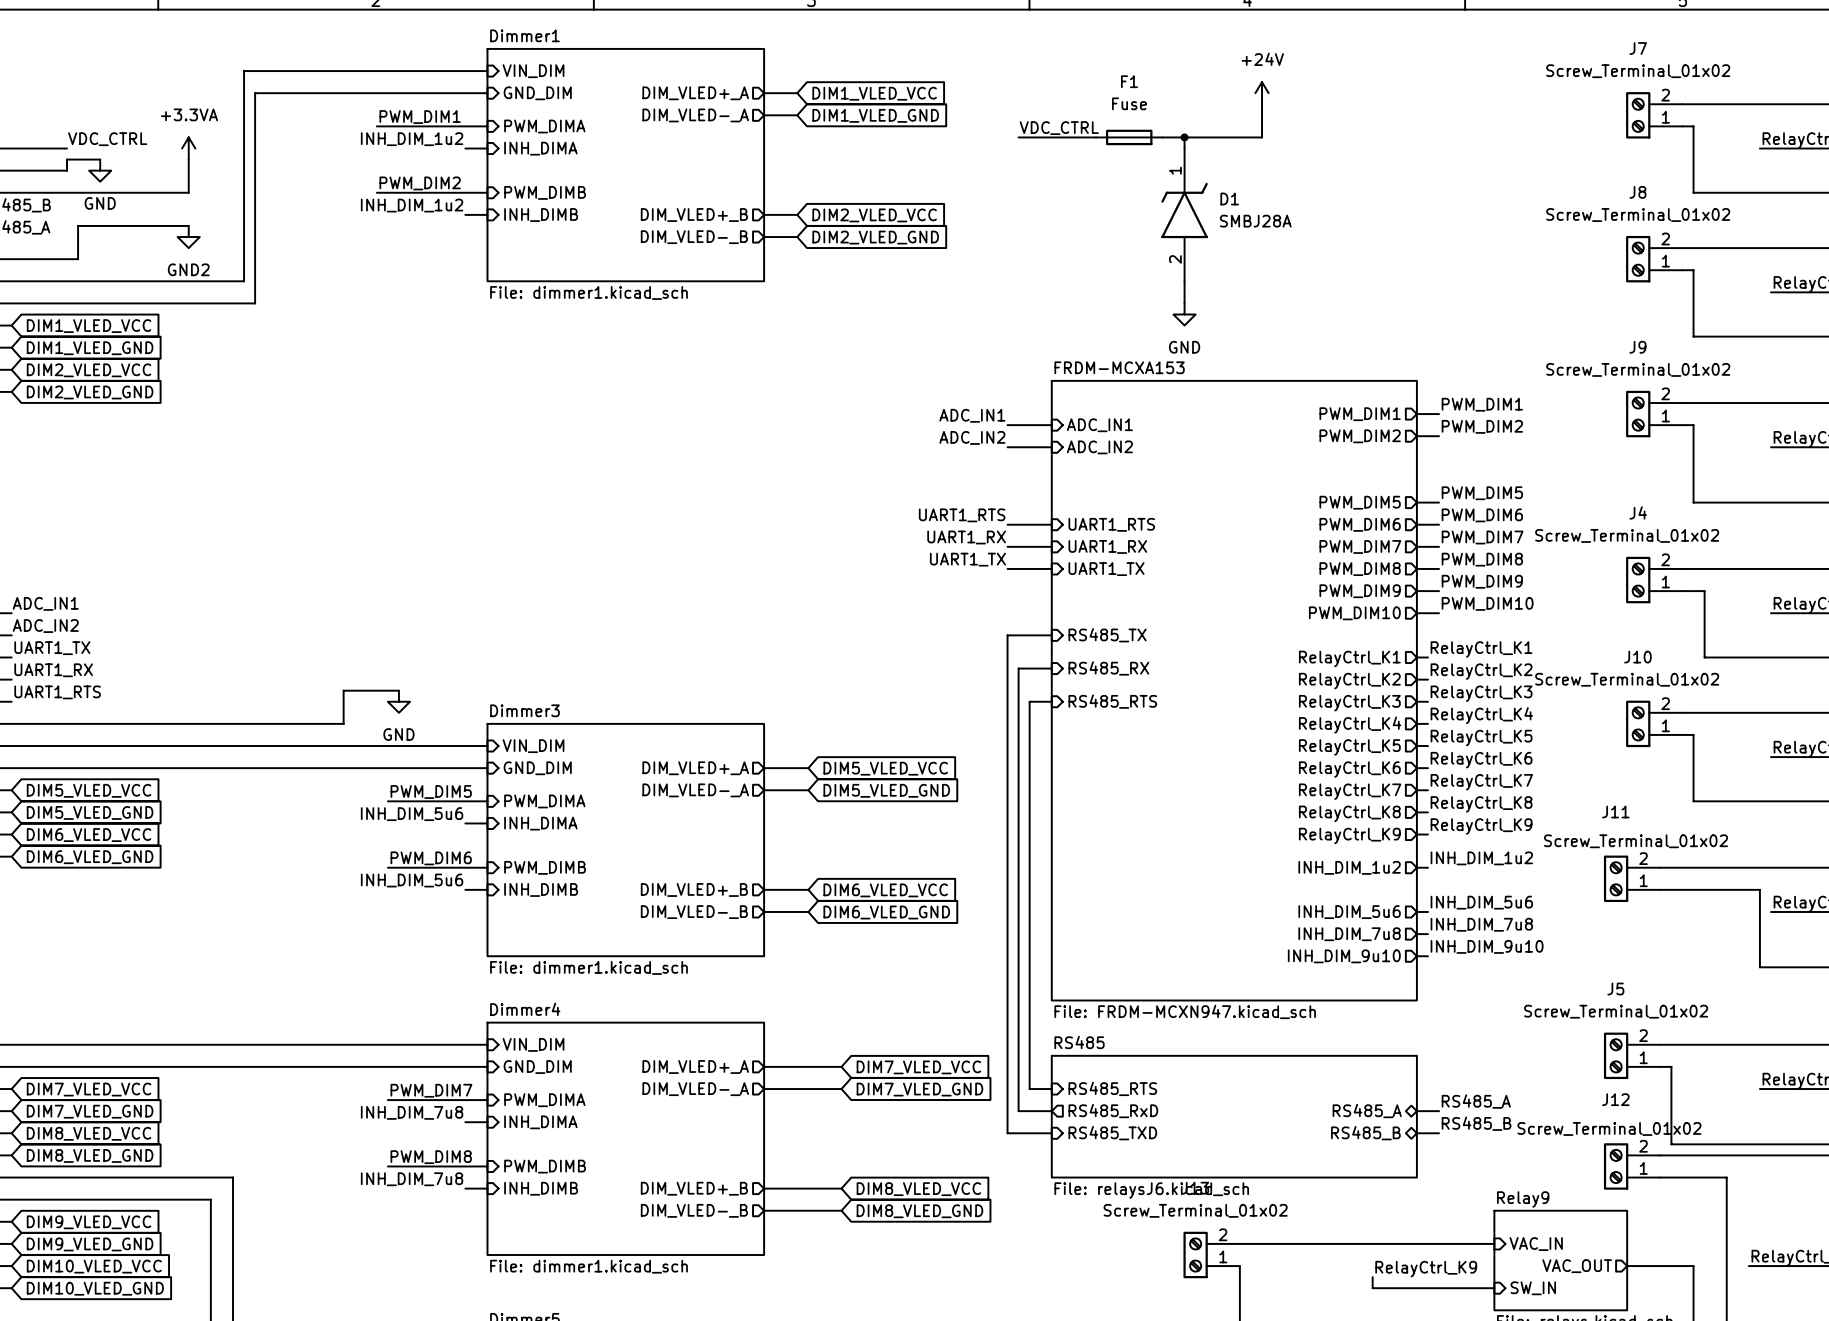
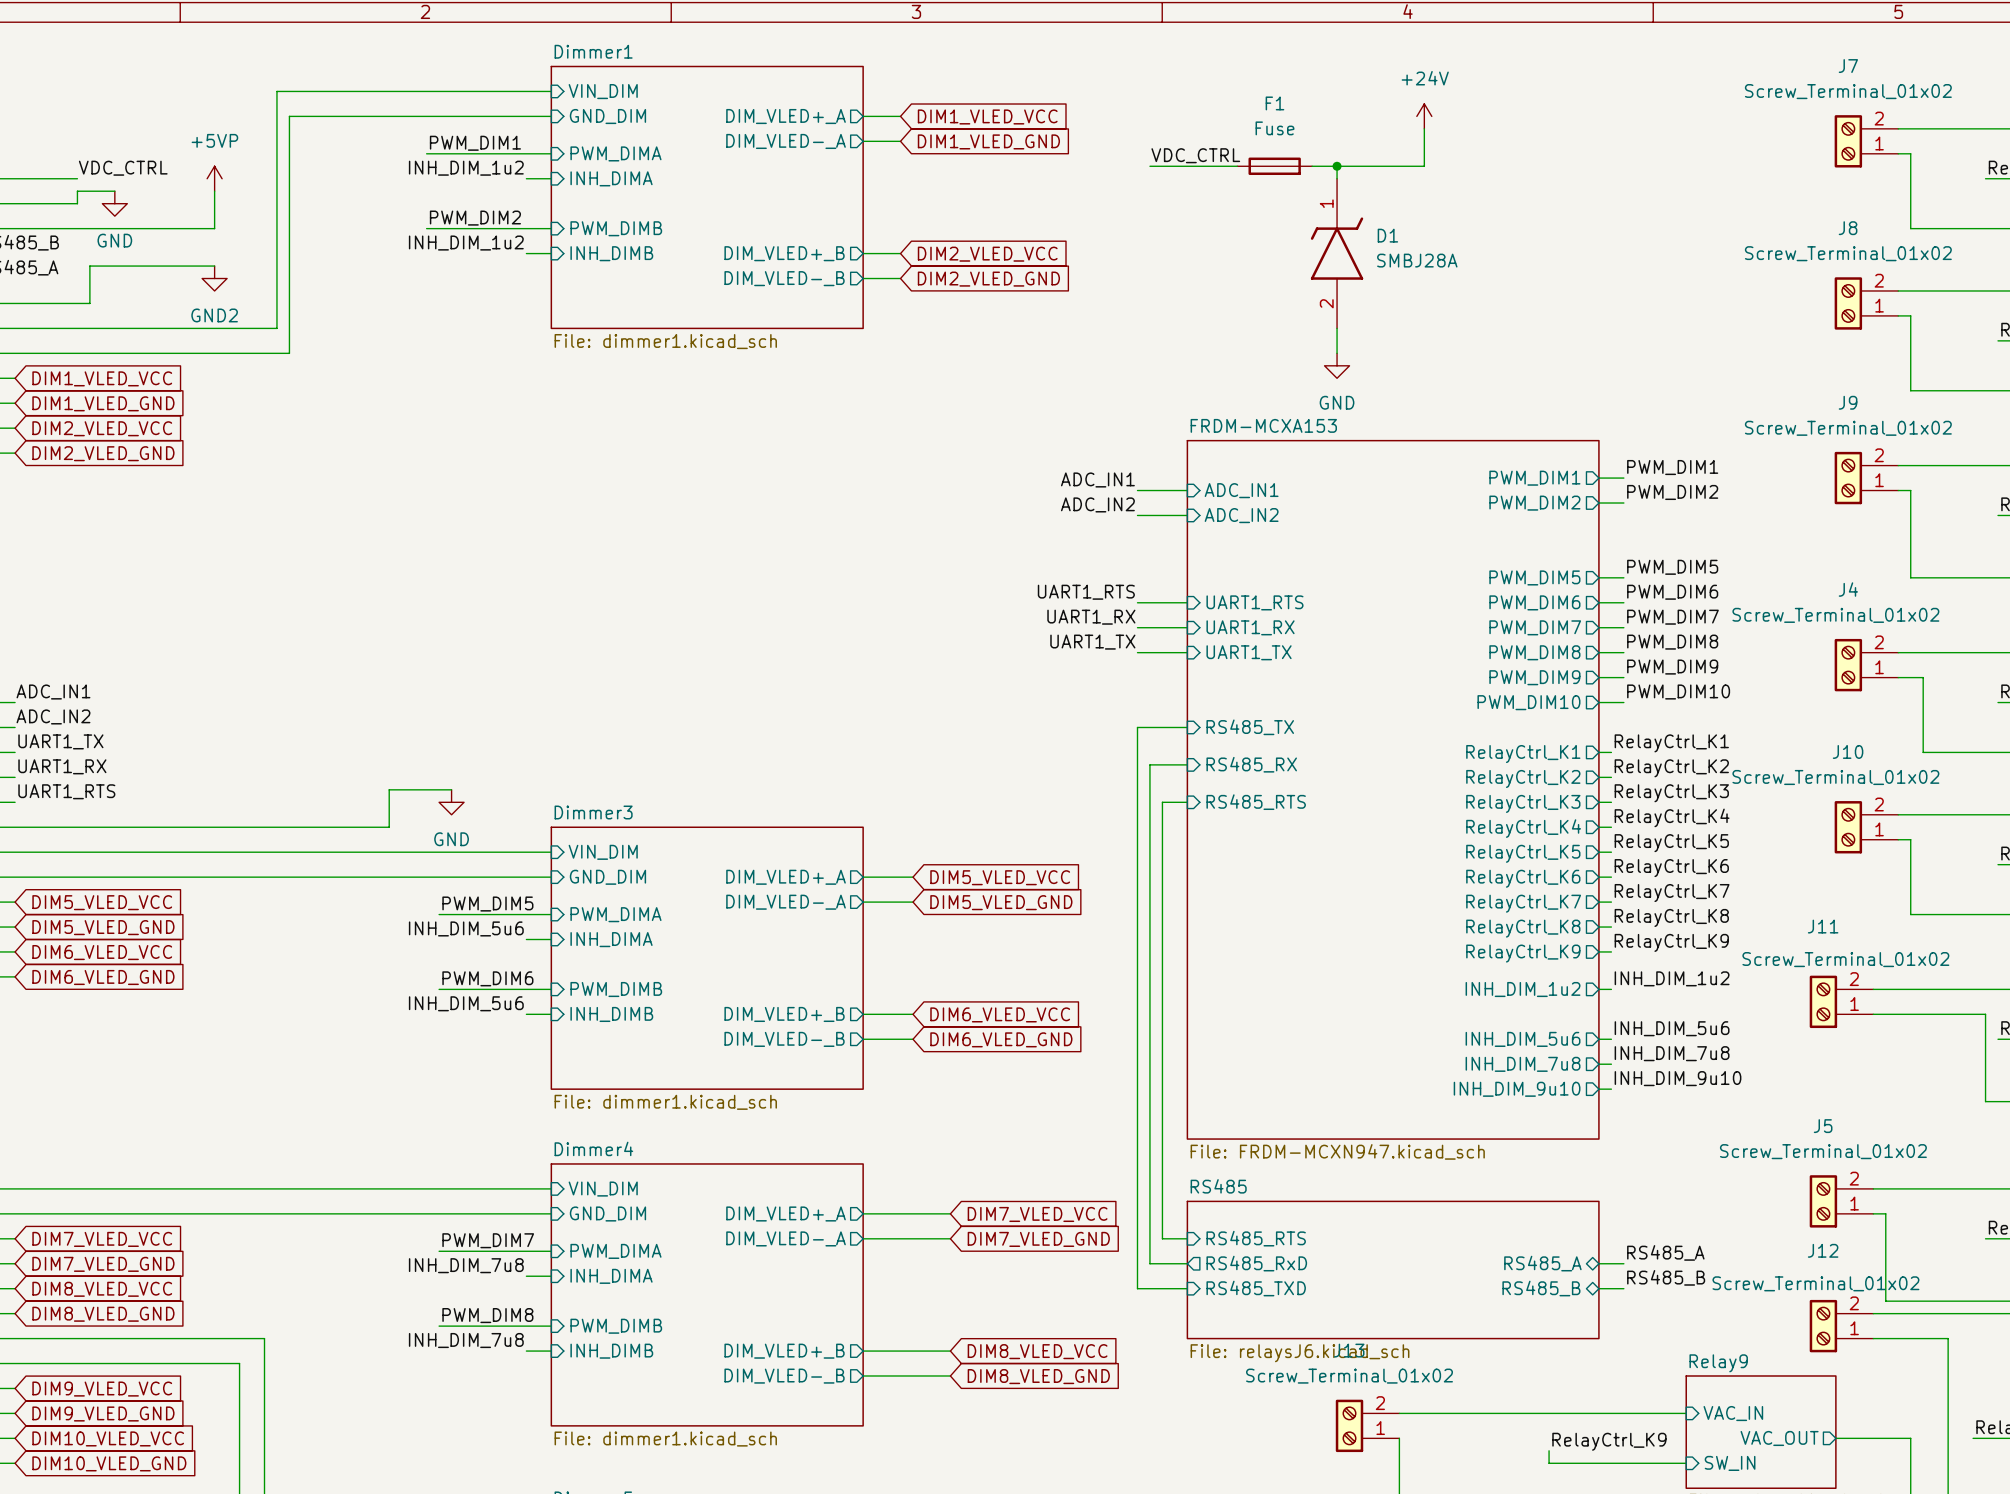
power symbol: +3.3VA (188, 148) -> +5VP (214, 178)

